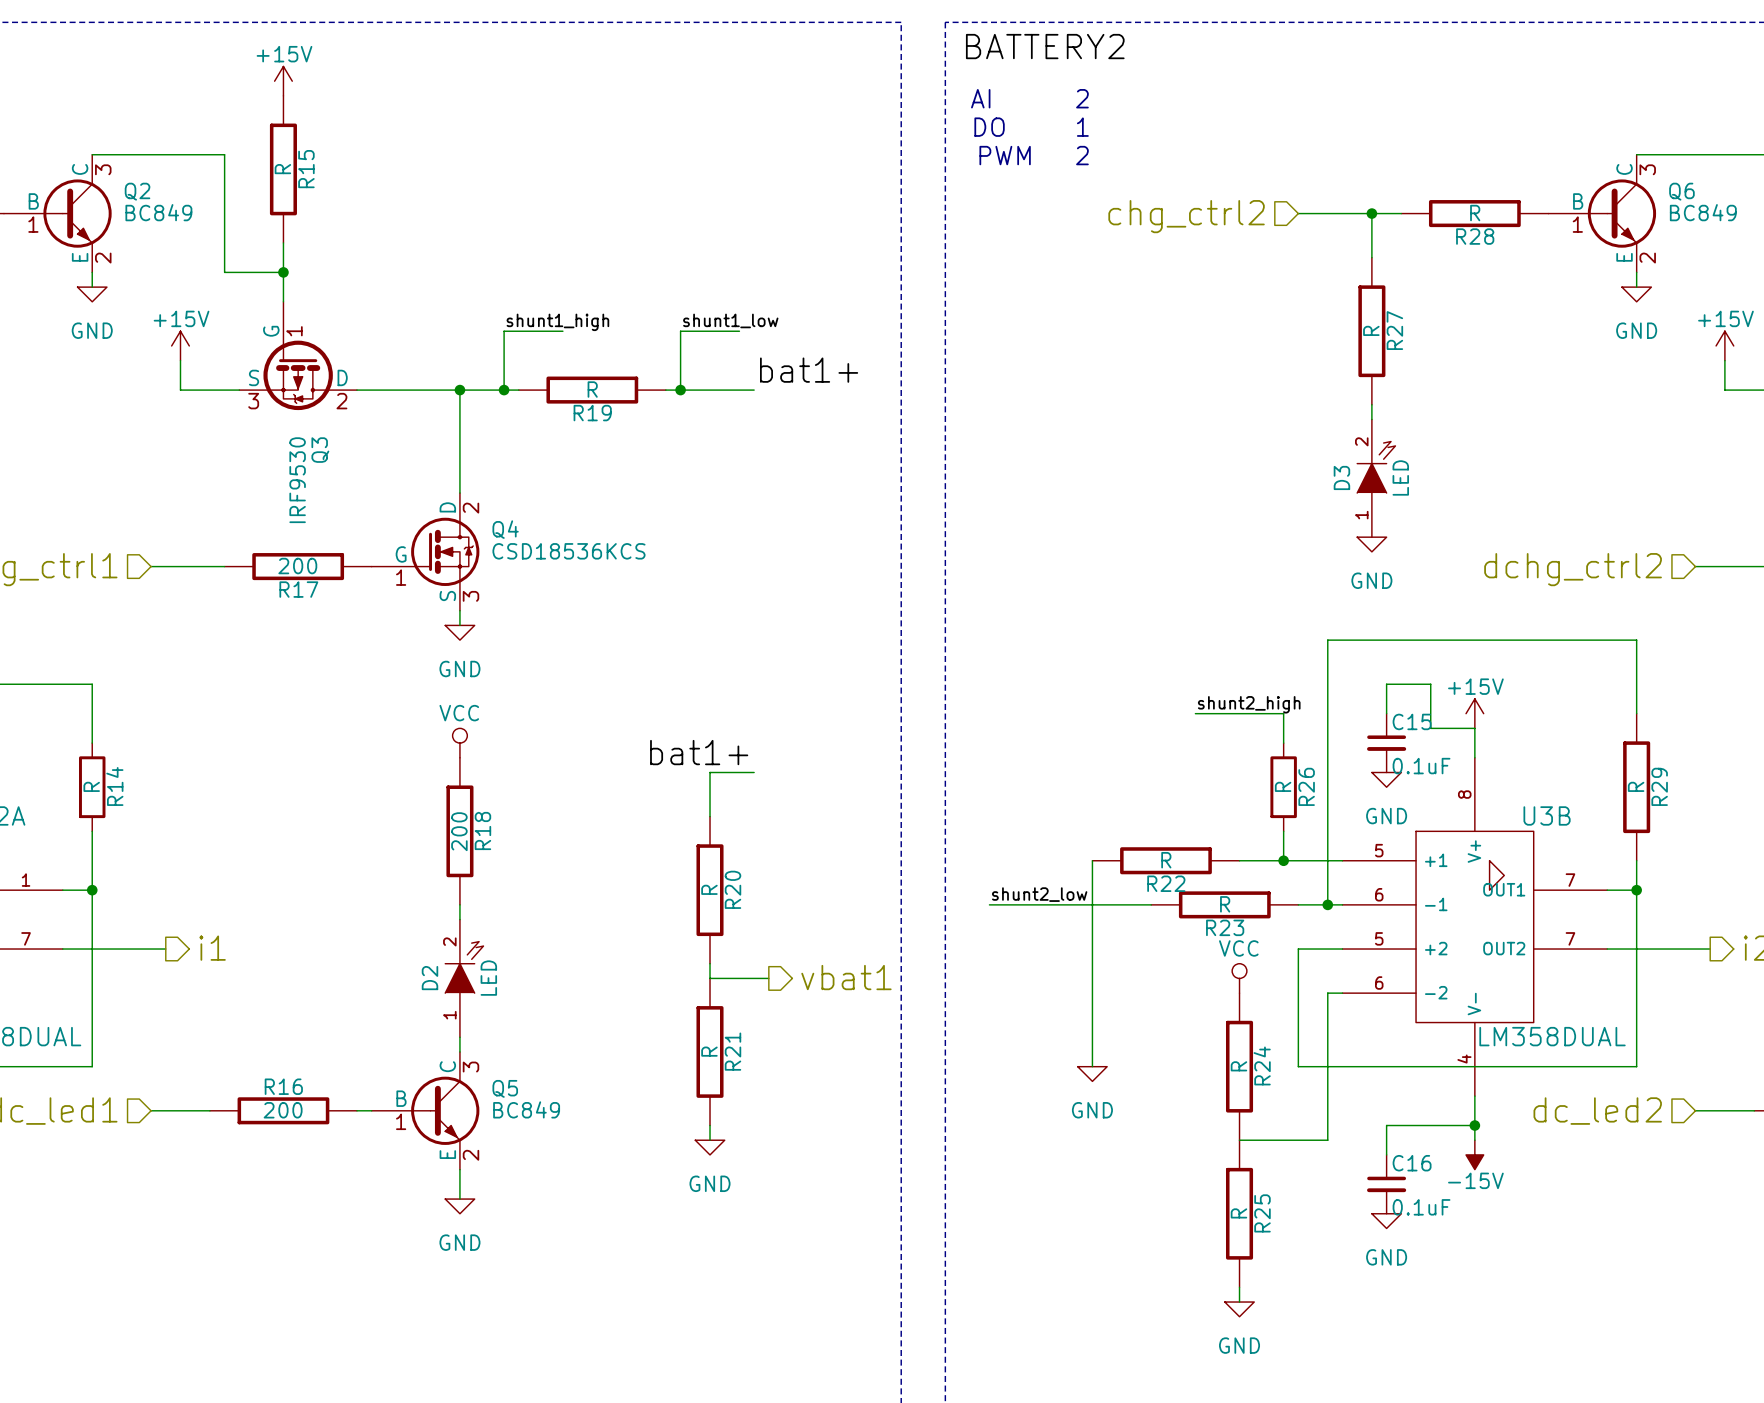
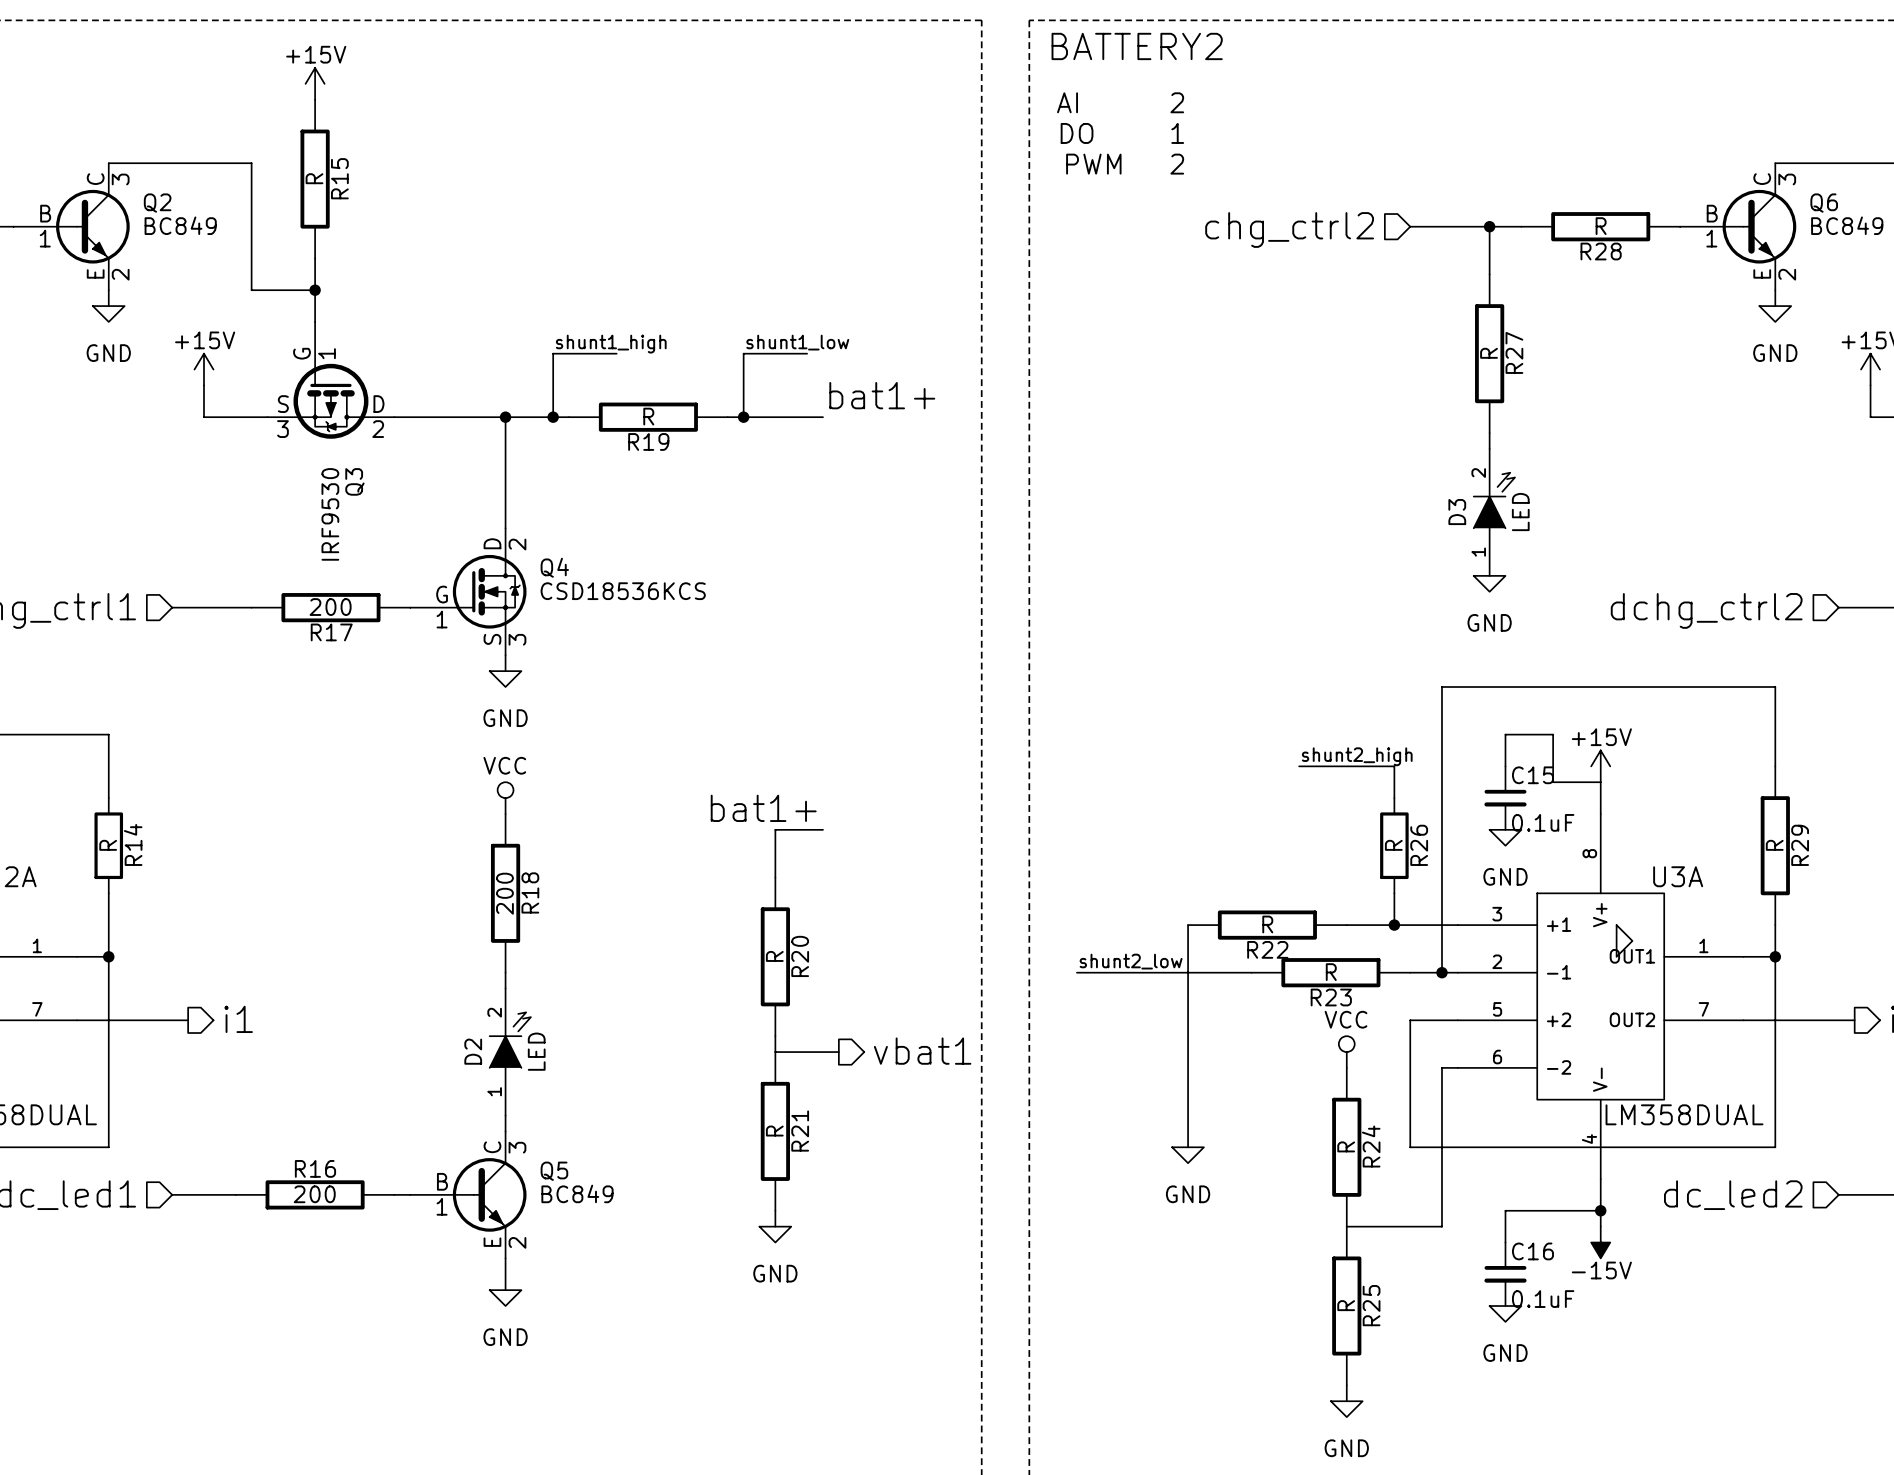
U3B name: U3B (1547, 815) -> U3A (1678, 876)
U3B pin number: 5 (1379, 850) -> 3 (1497, 914)
U3B pin number: 7 (1570, 880) -> 1 (1703, 945)
U3B pin number: 6 (1379, 894) -> 2 (1497, 961)

